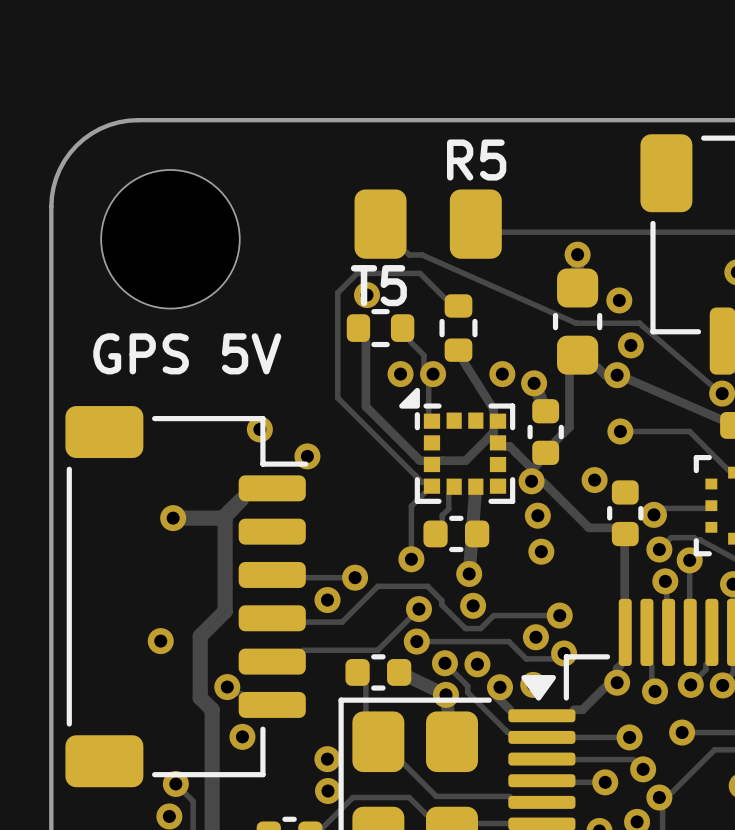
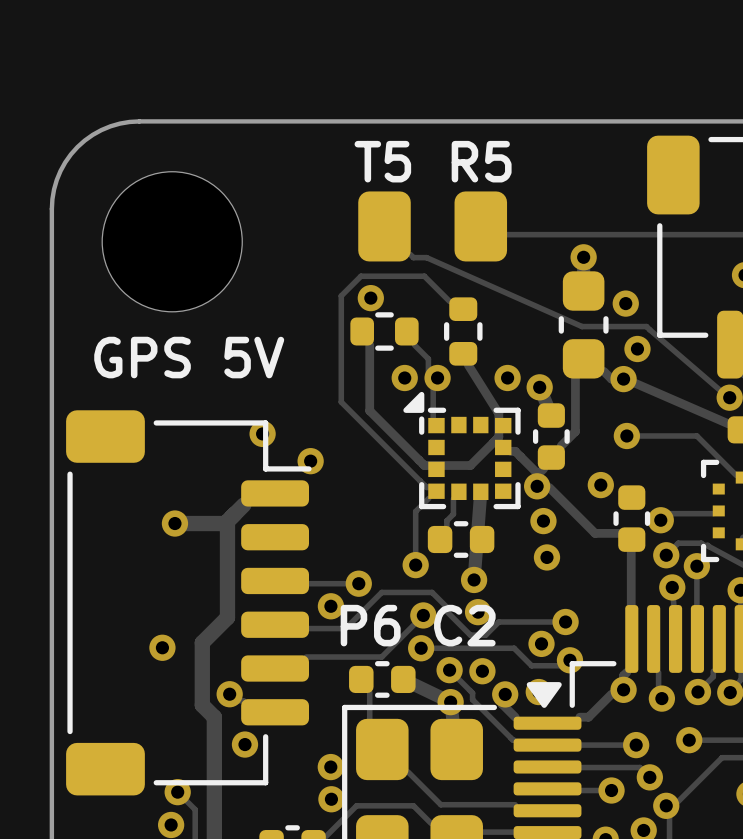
text position: T5 (378, 285) -> T5 (382, 161)
text: none -> P6 C2 (418, 625)

